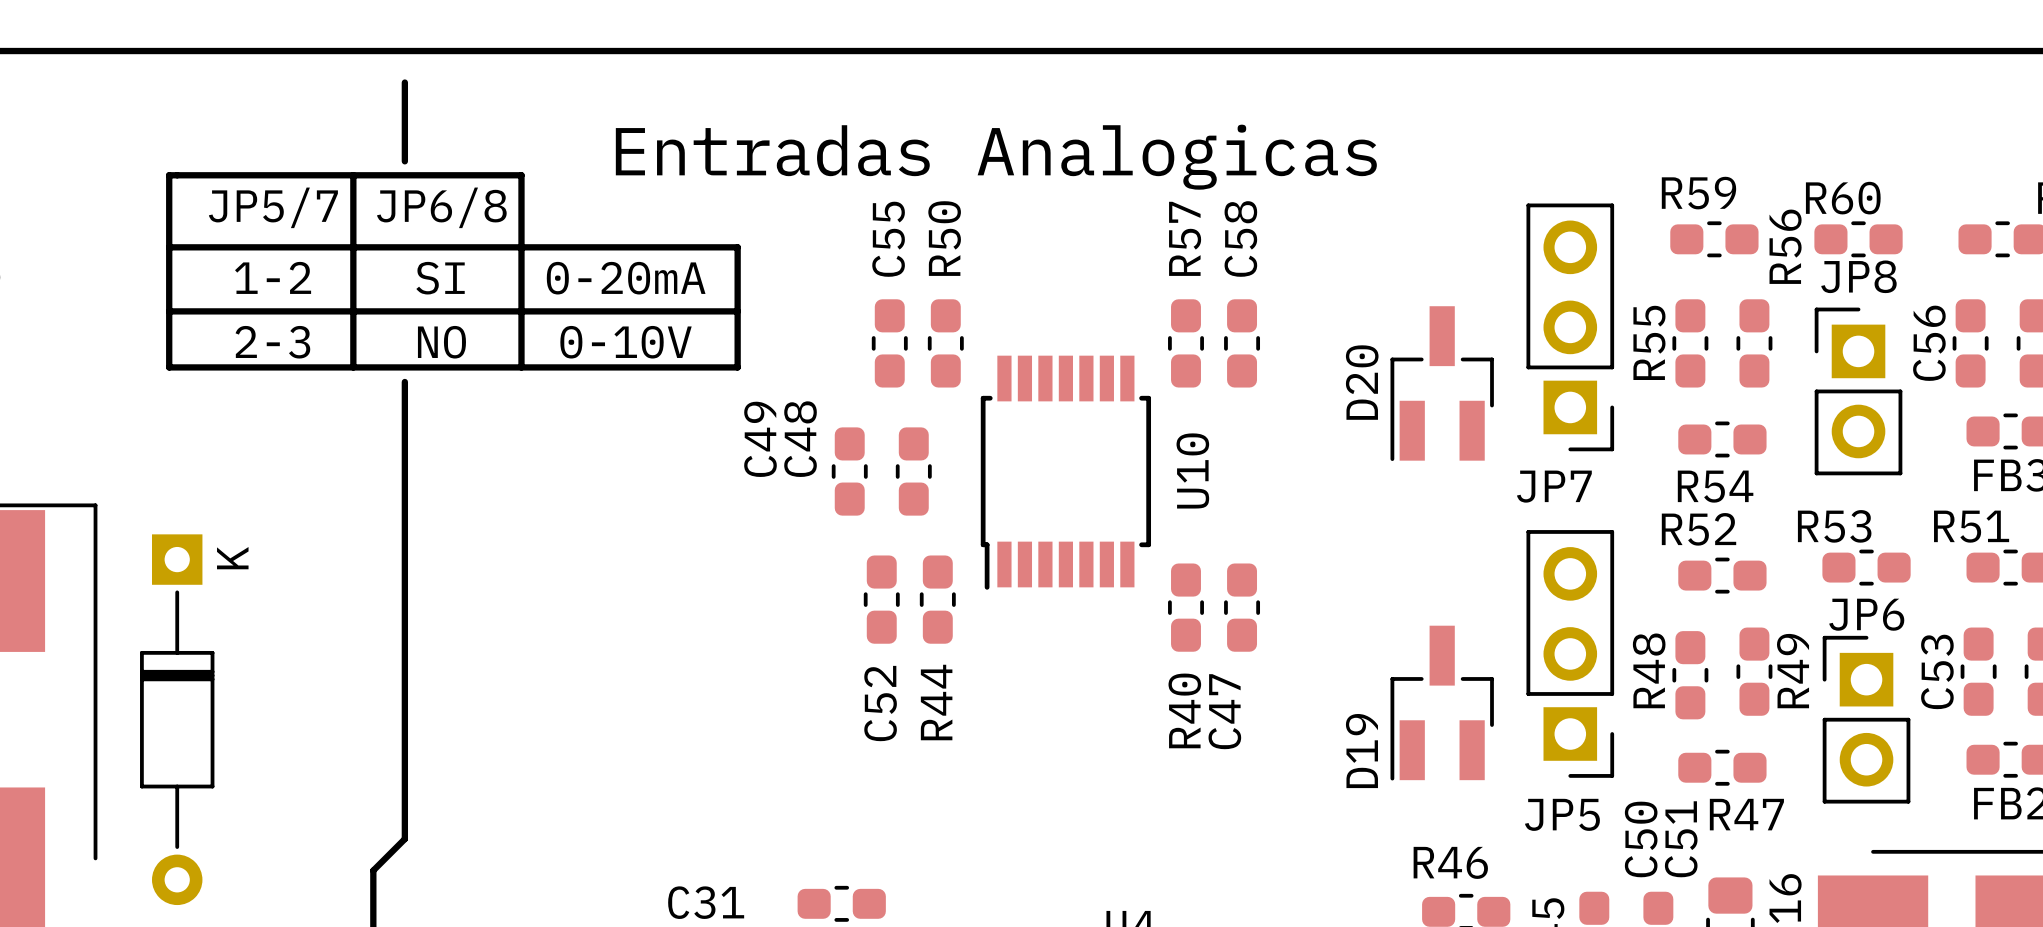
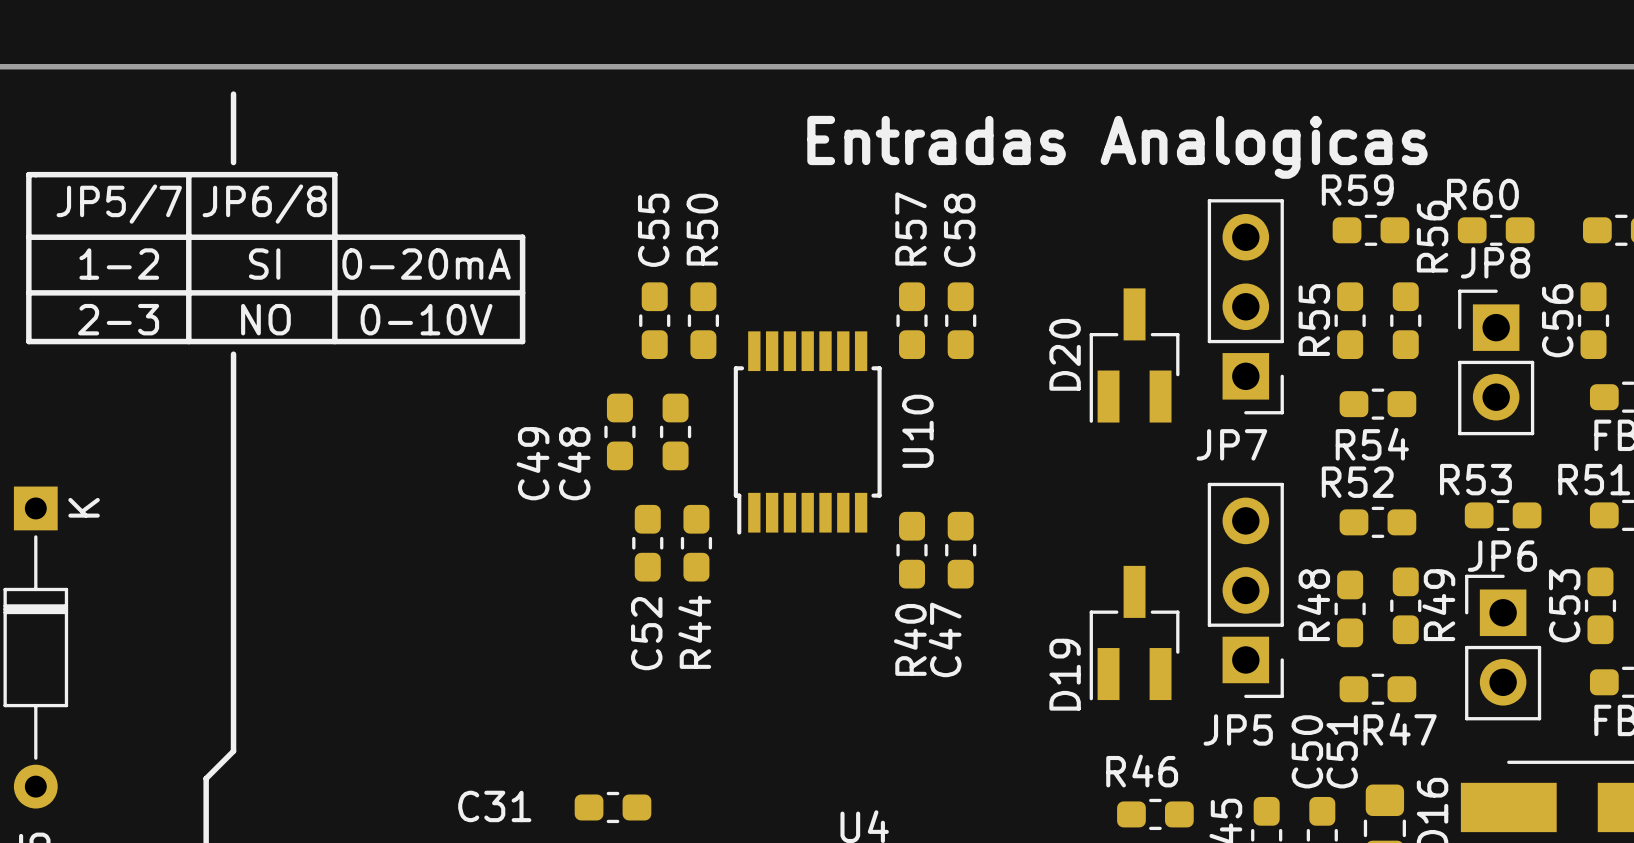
text position: Entradas Analogicas (996, 157) -> Entradas Analogicas (1117, 147)
C49 name position: C49 (760, 439) -> C49 (533, 463)
C48 name position: C48 (800, 439) -> C48 (574, 463)

